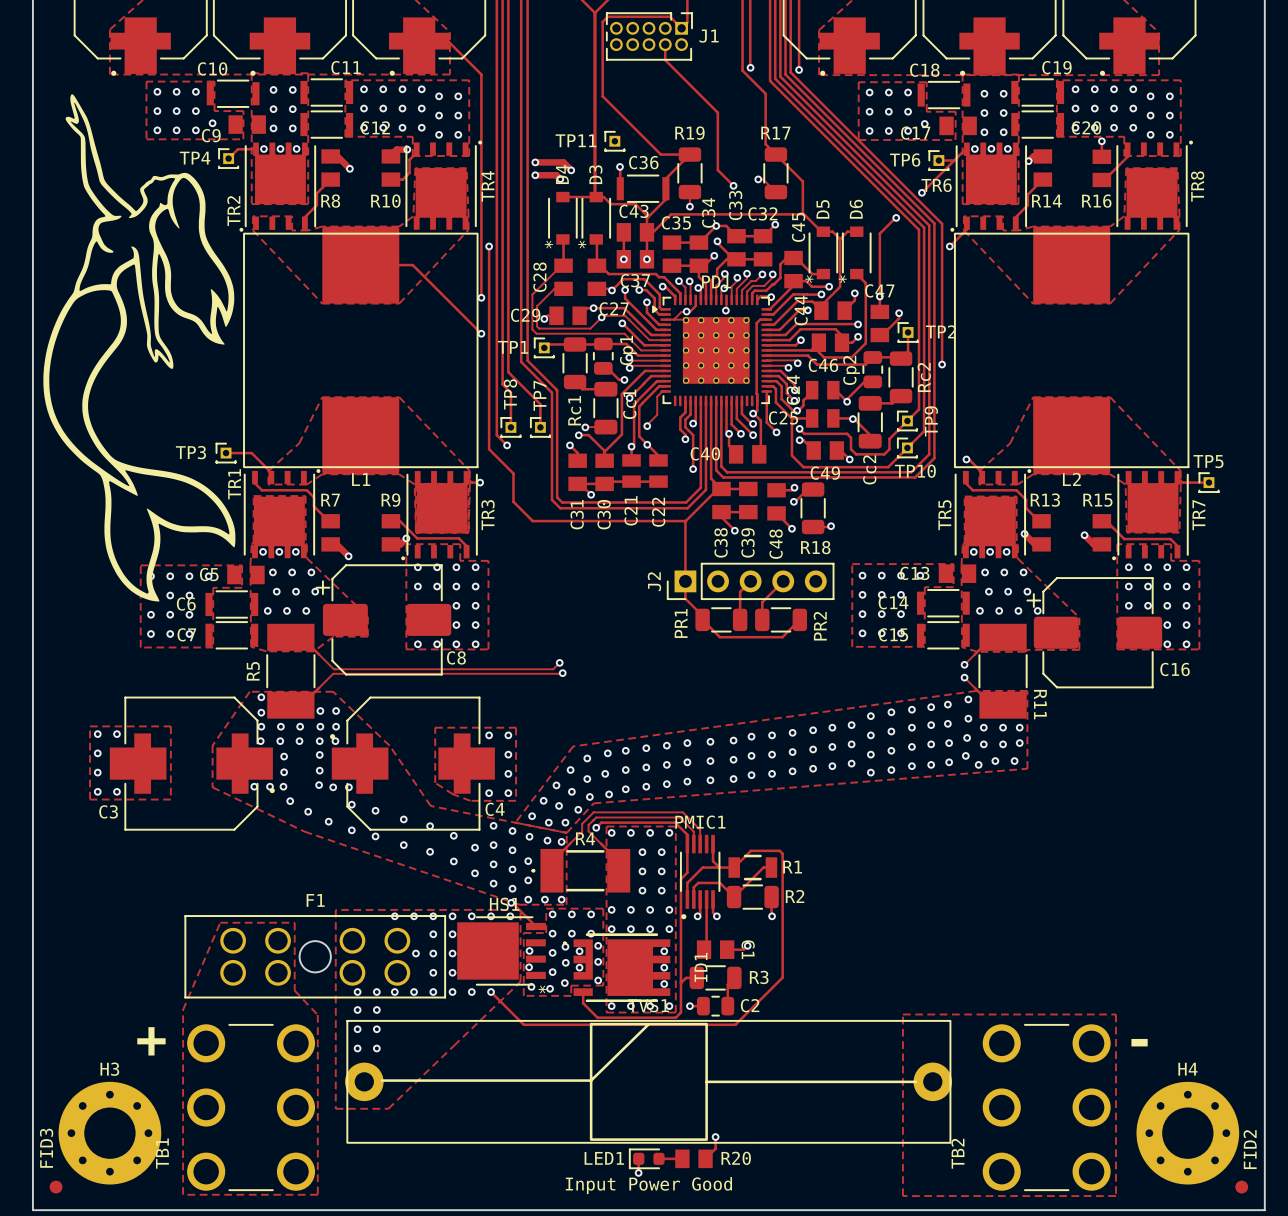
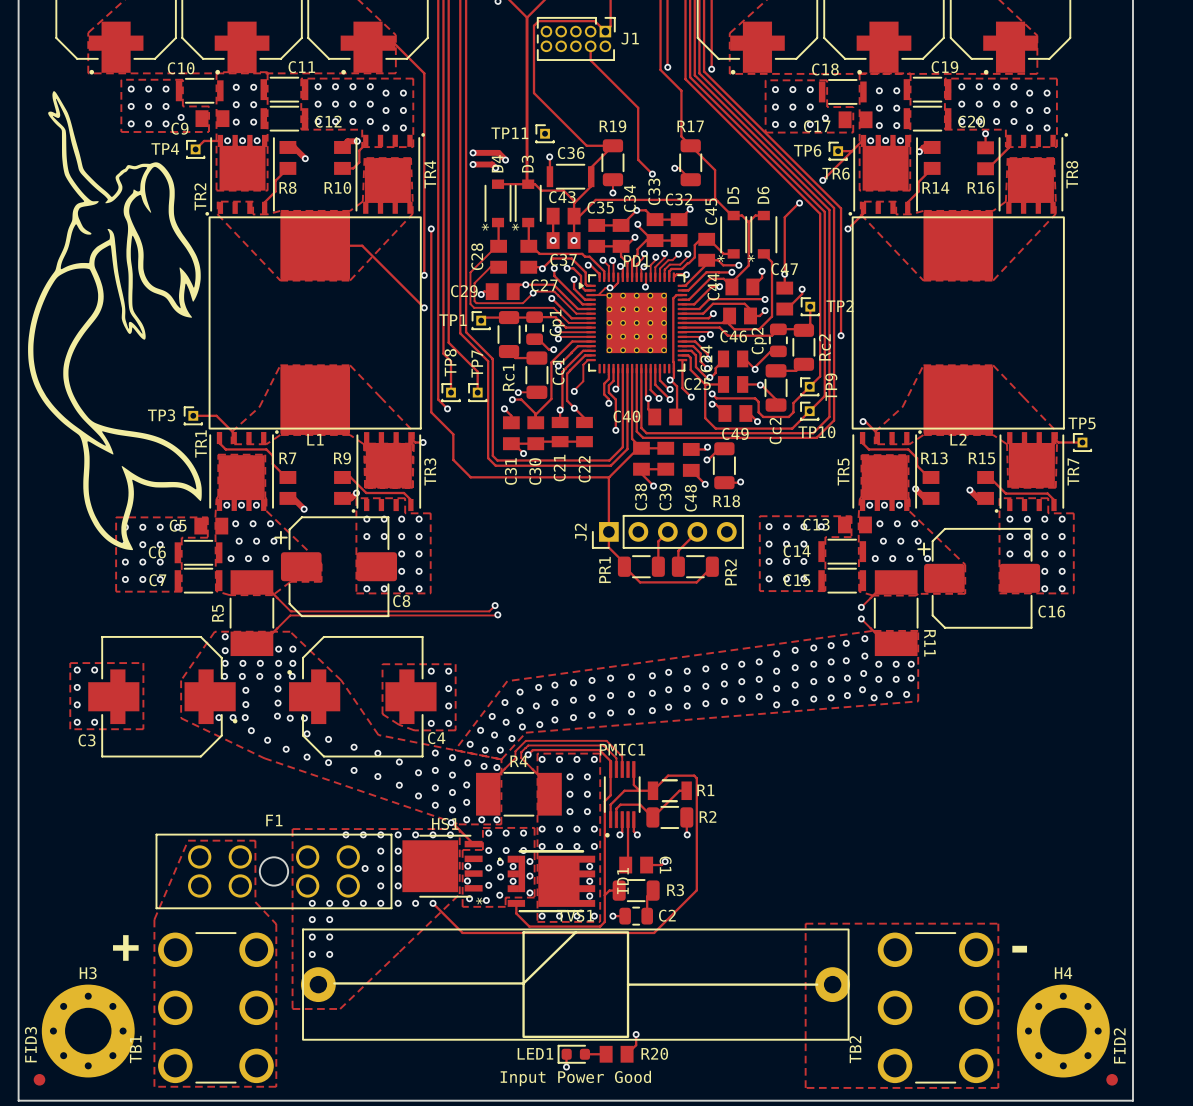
R4 footprint: [531, 848, 631, 893] -> [476, 771, 562, 817]

